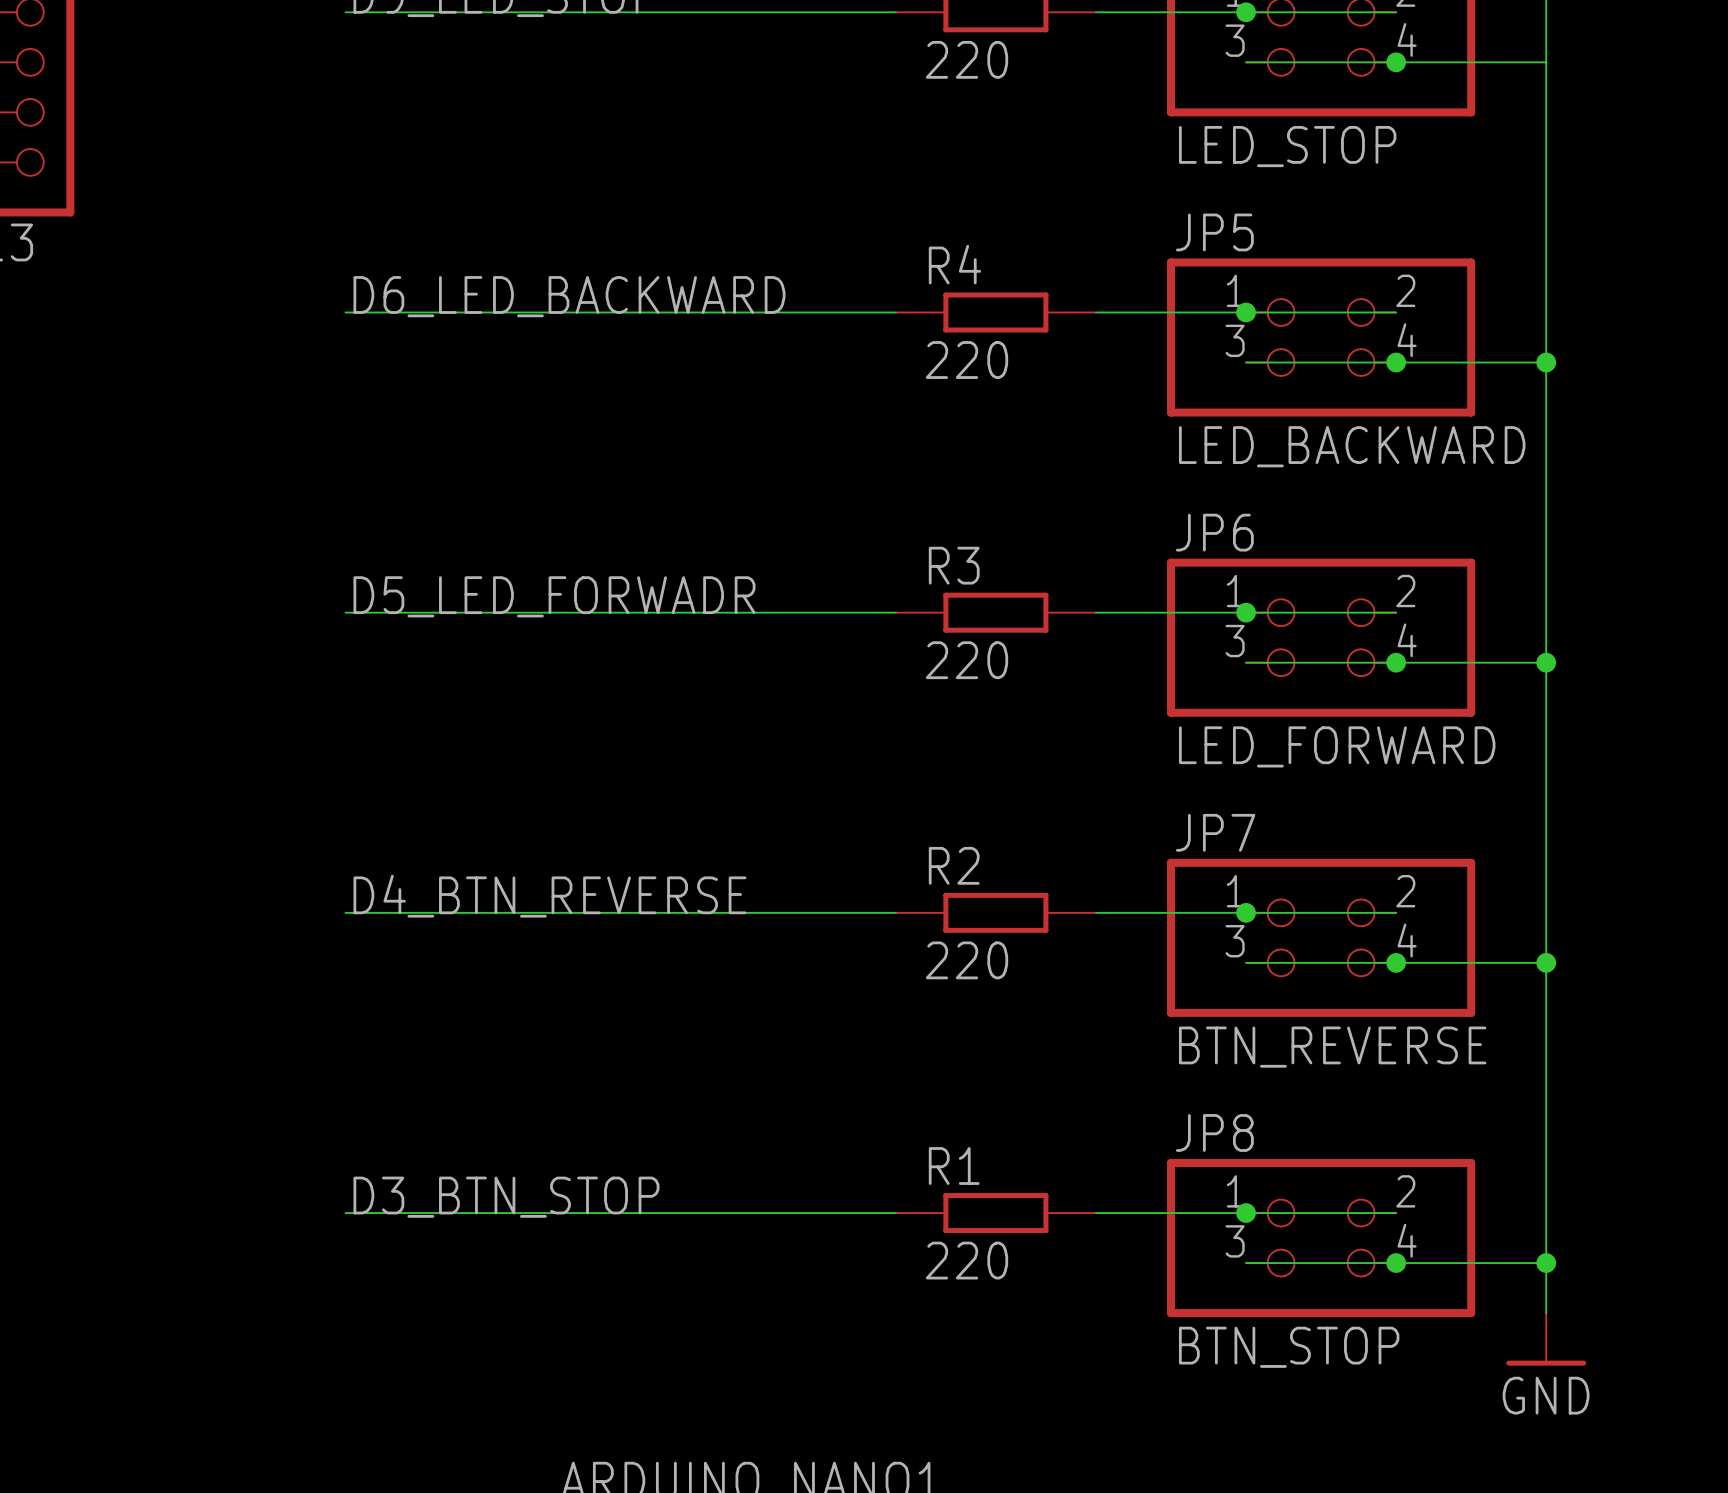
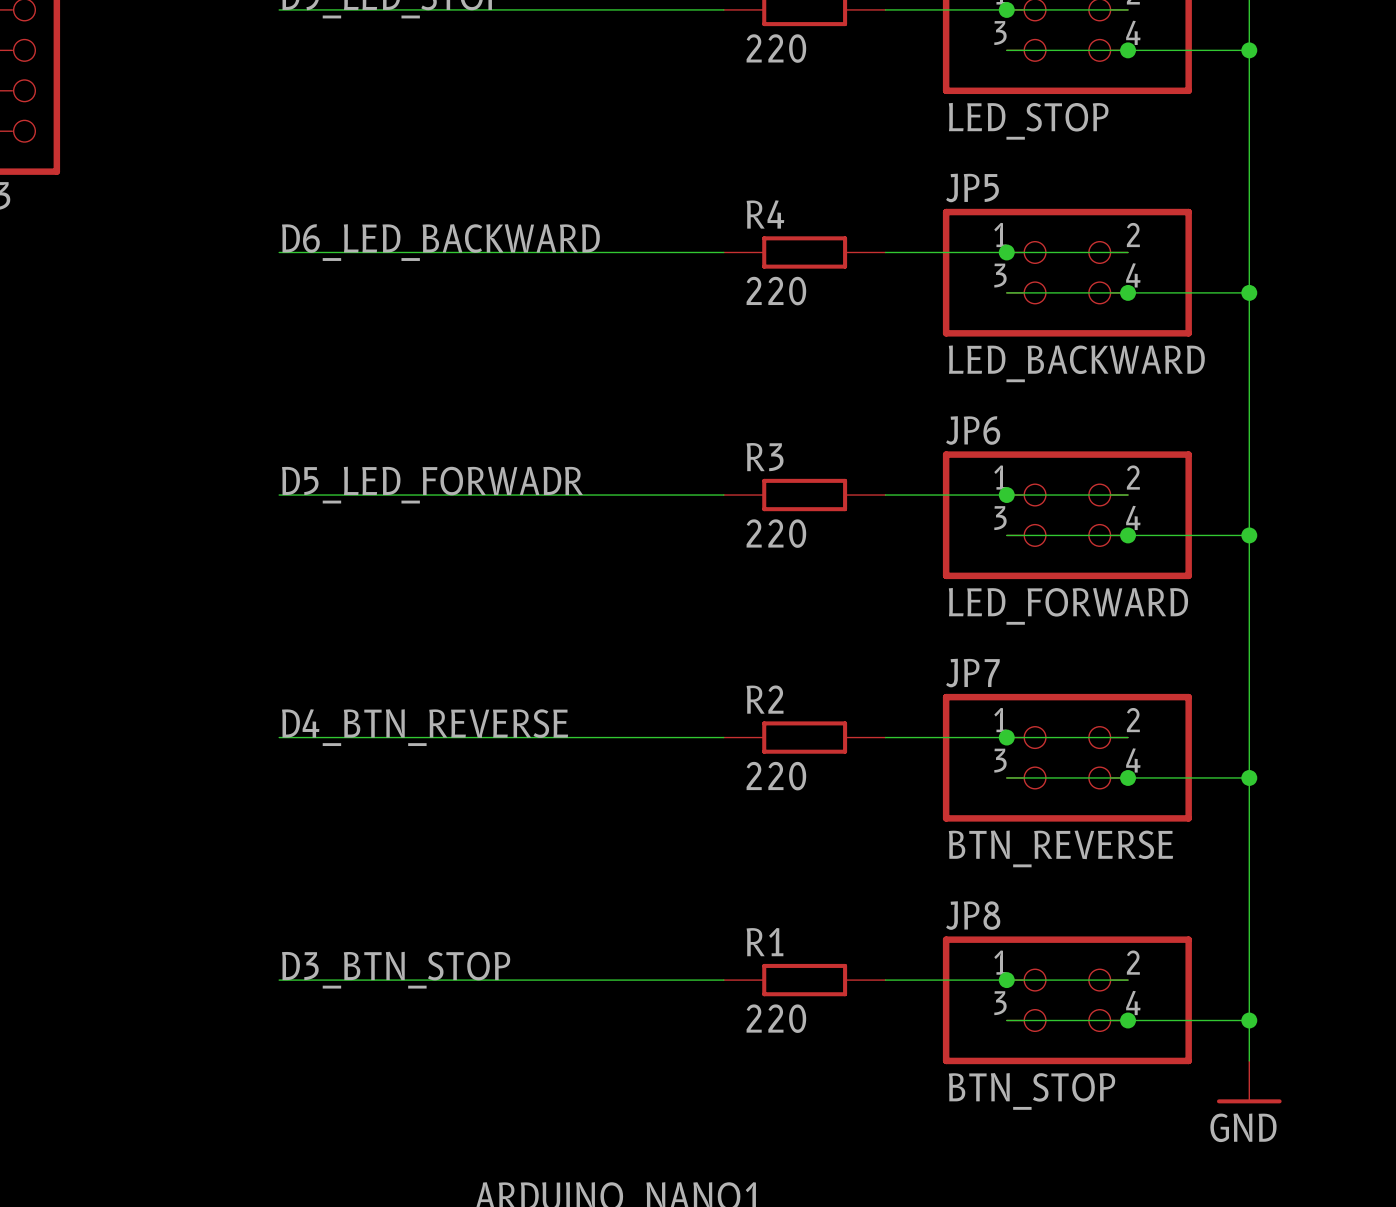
junction: none -> (1249, 50)

